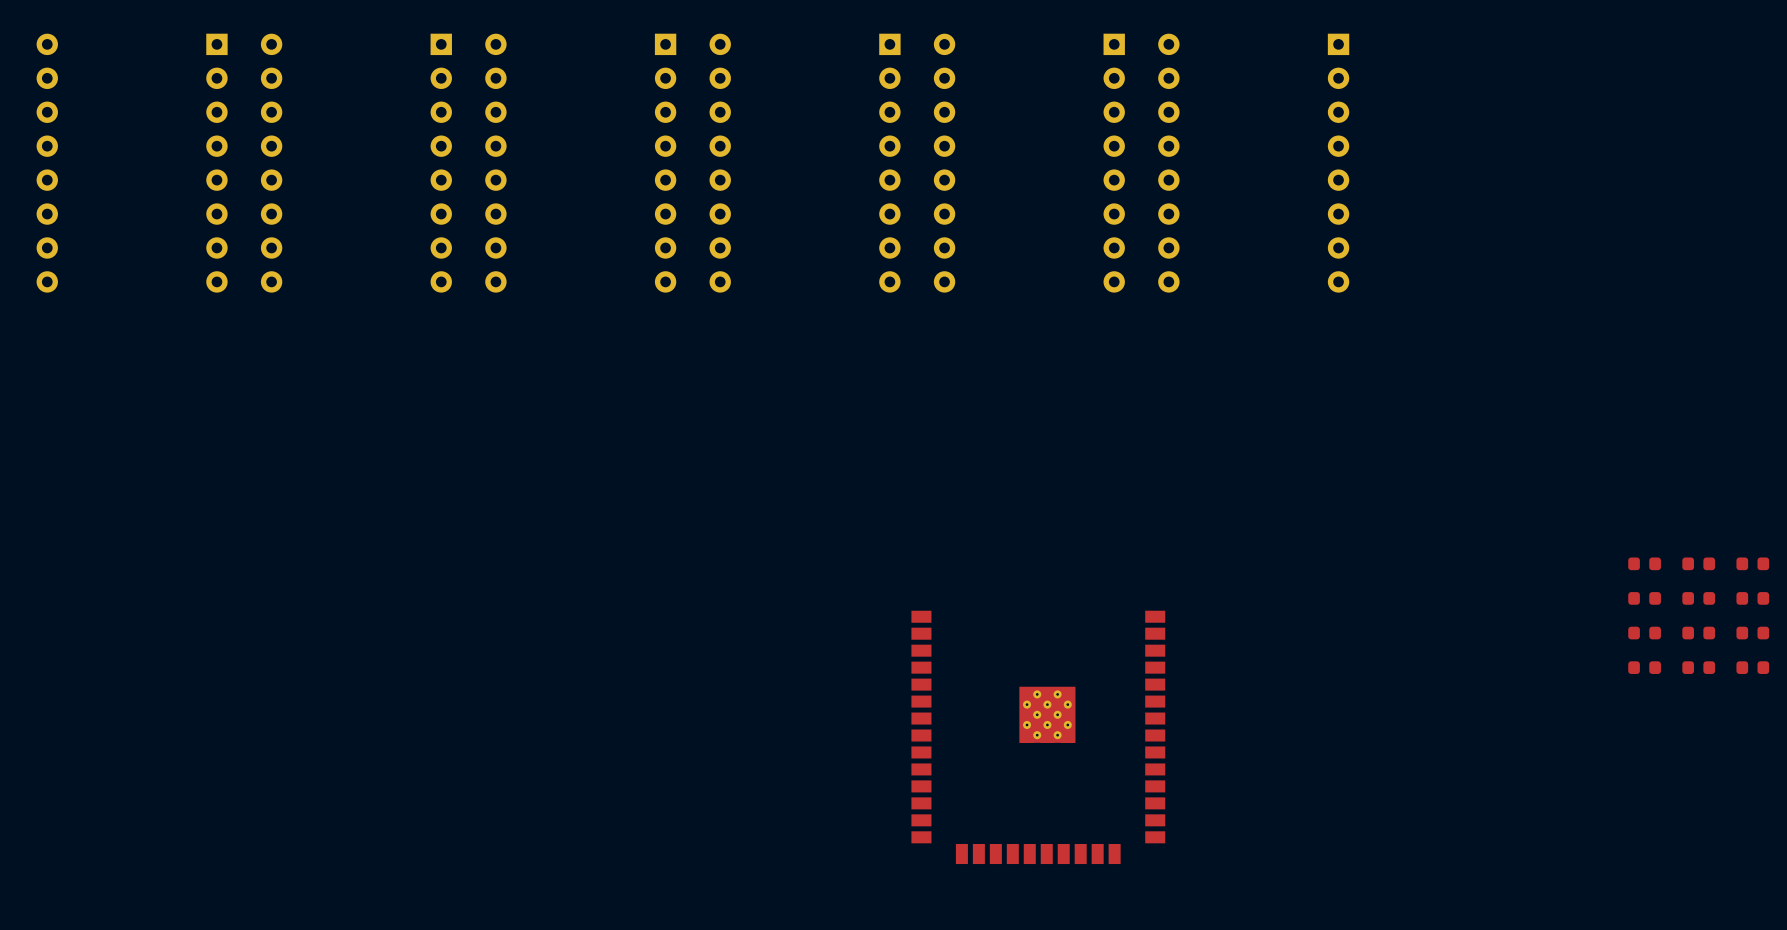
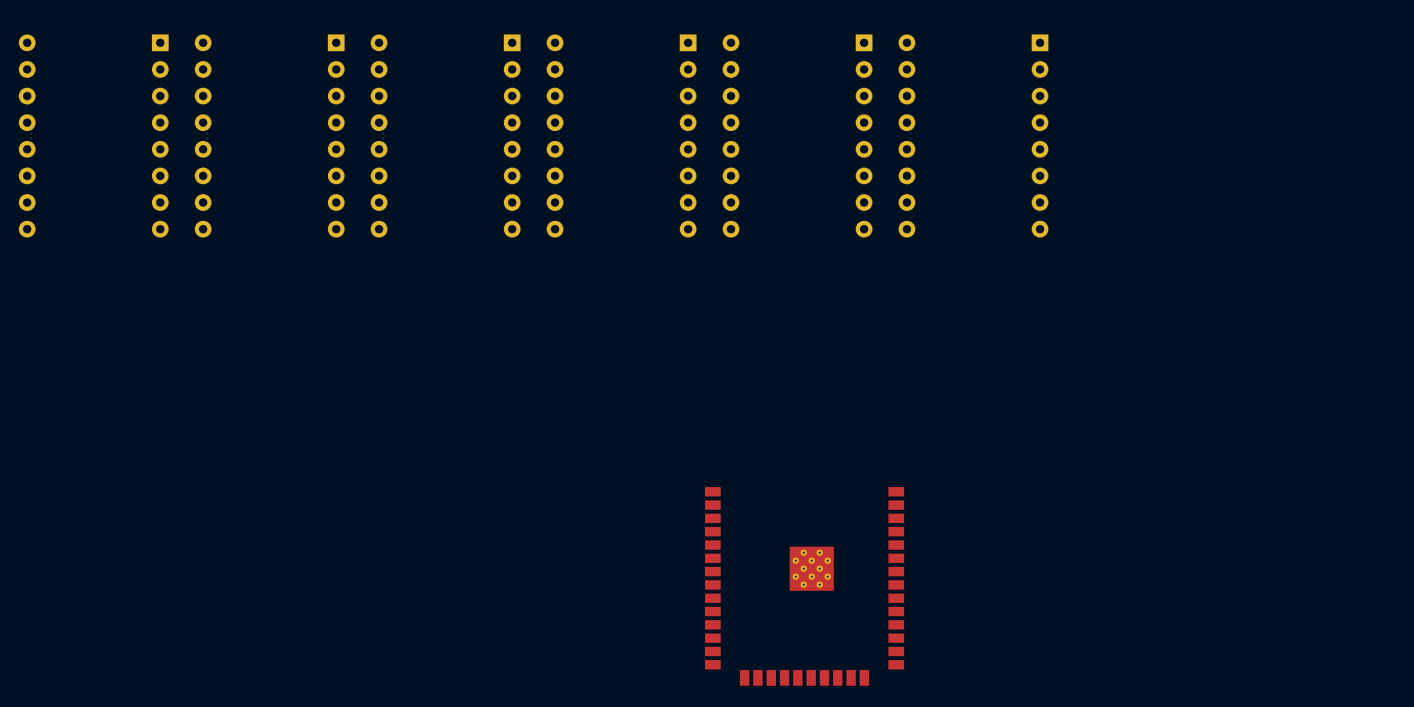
part: (1644, 563) -> none
part: (1698, 563) -> none
part: (1752, 563) -> none
part: (1644, 598) -> none
part: (1698, 598) -> none
part: (1752, 598) -> none
part: (1644, 633) -> none
part: (1698, 633) -> none
part: (1752, 633) -> none
part: (1644, 667) -> none
part: (1698, 667) -> none
part: (1752, 667) -> none

